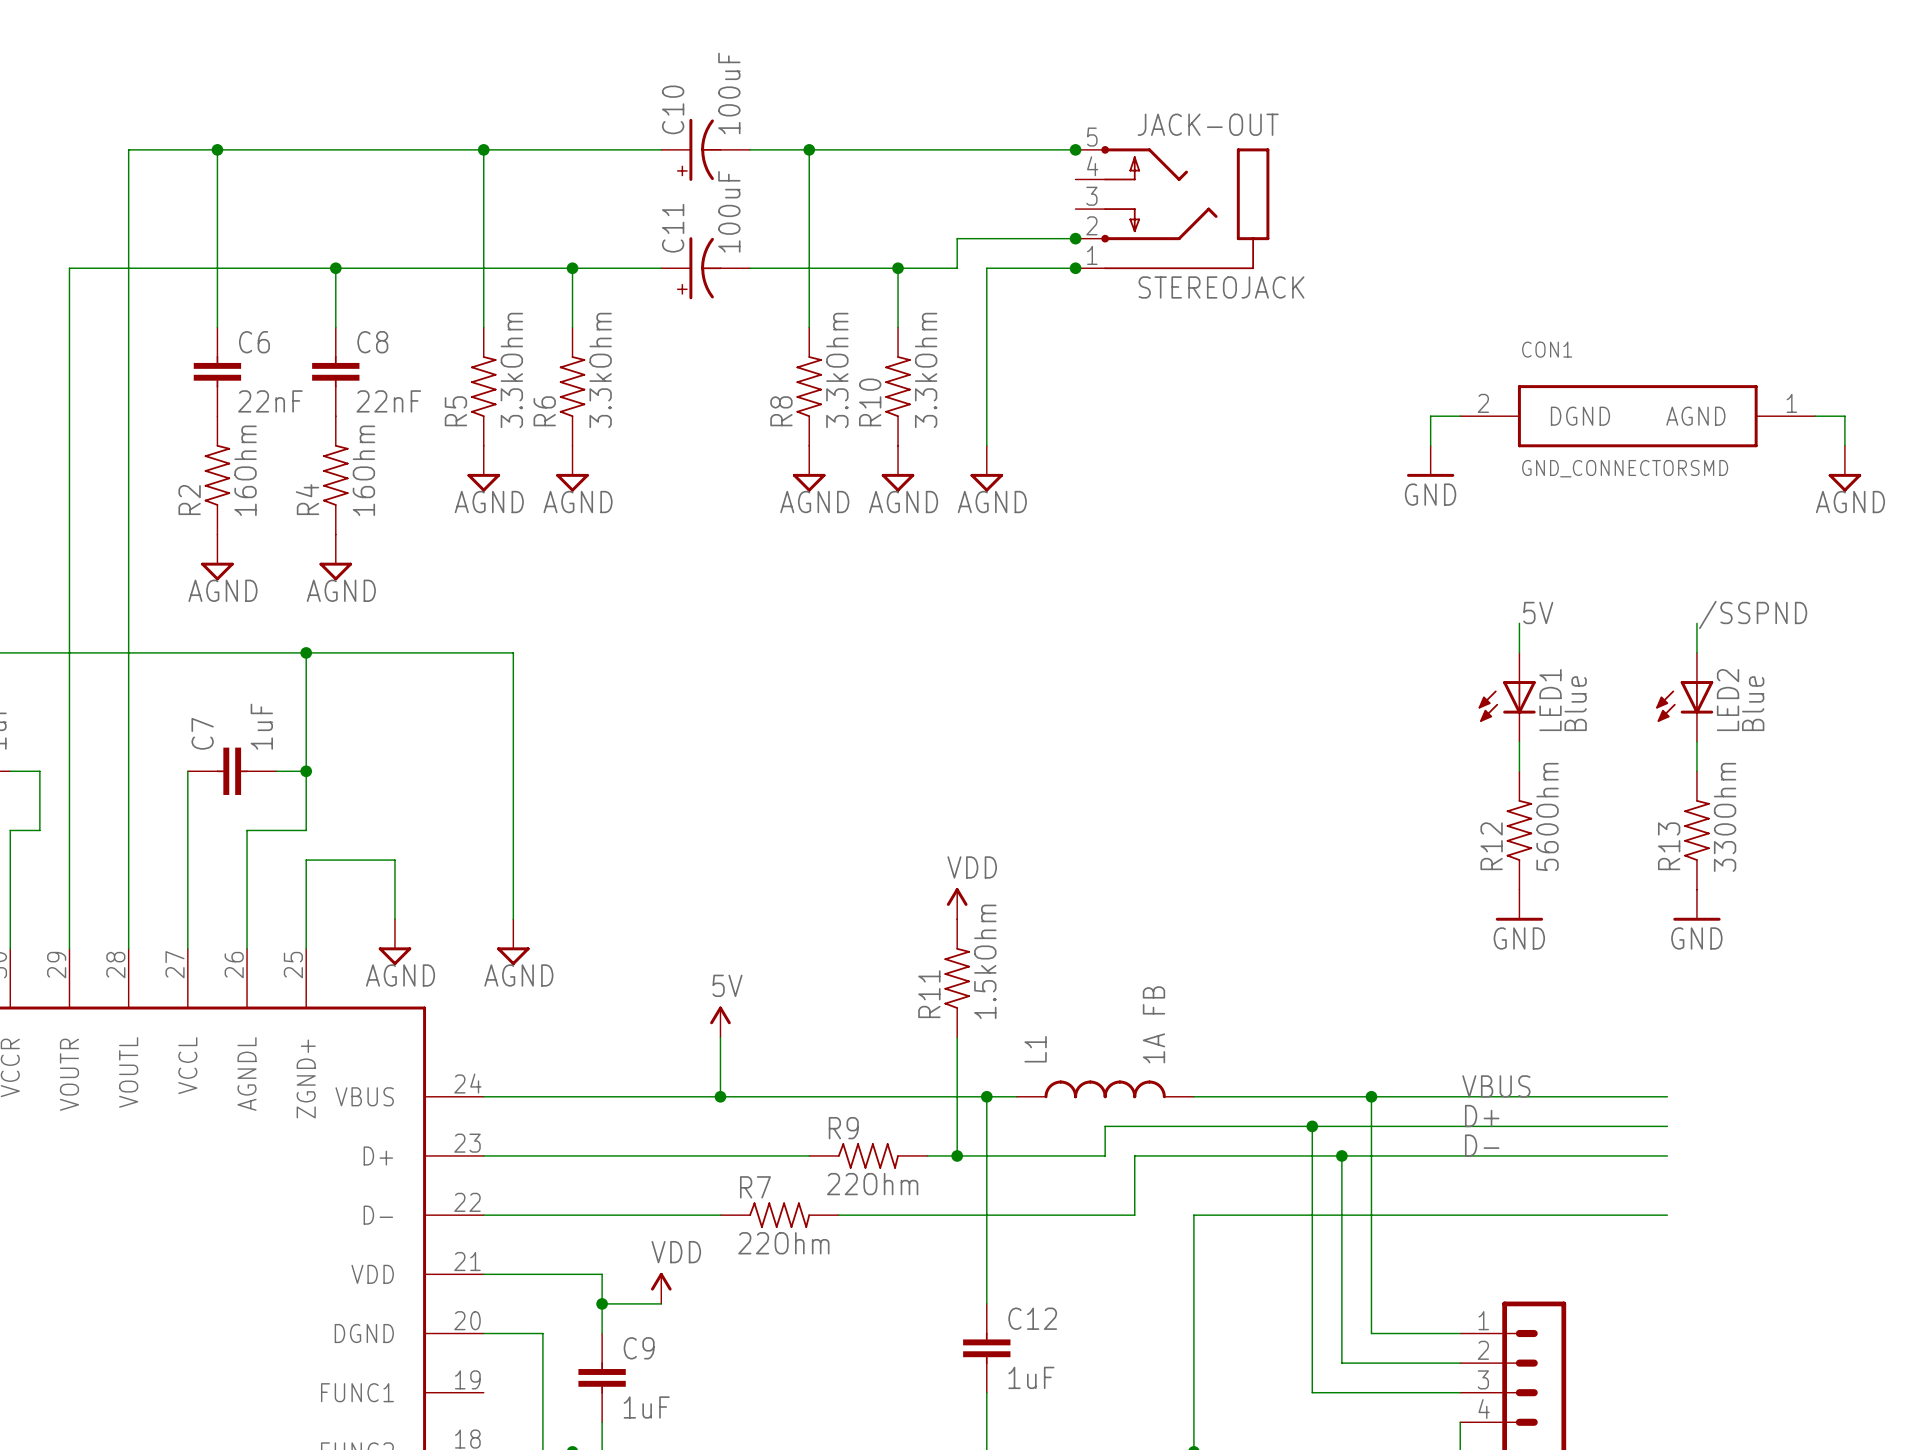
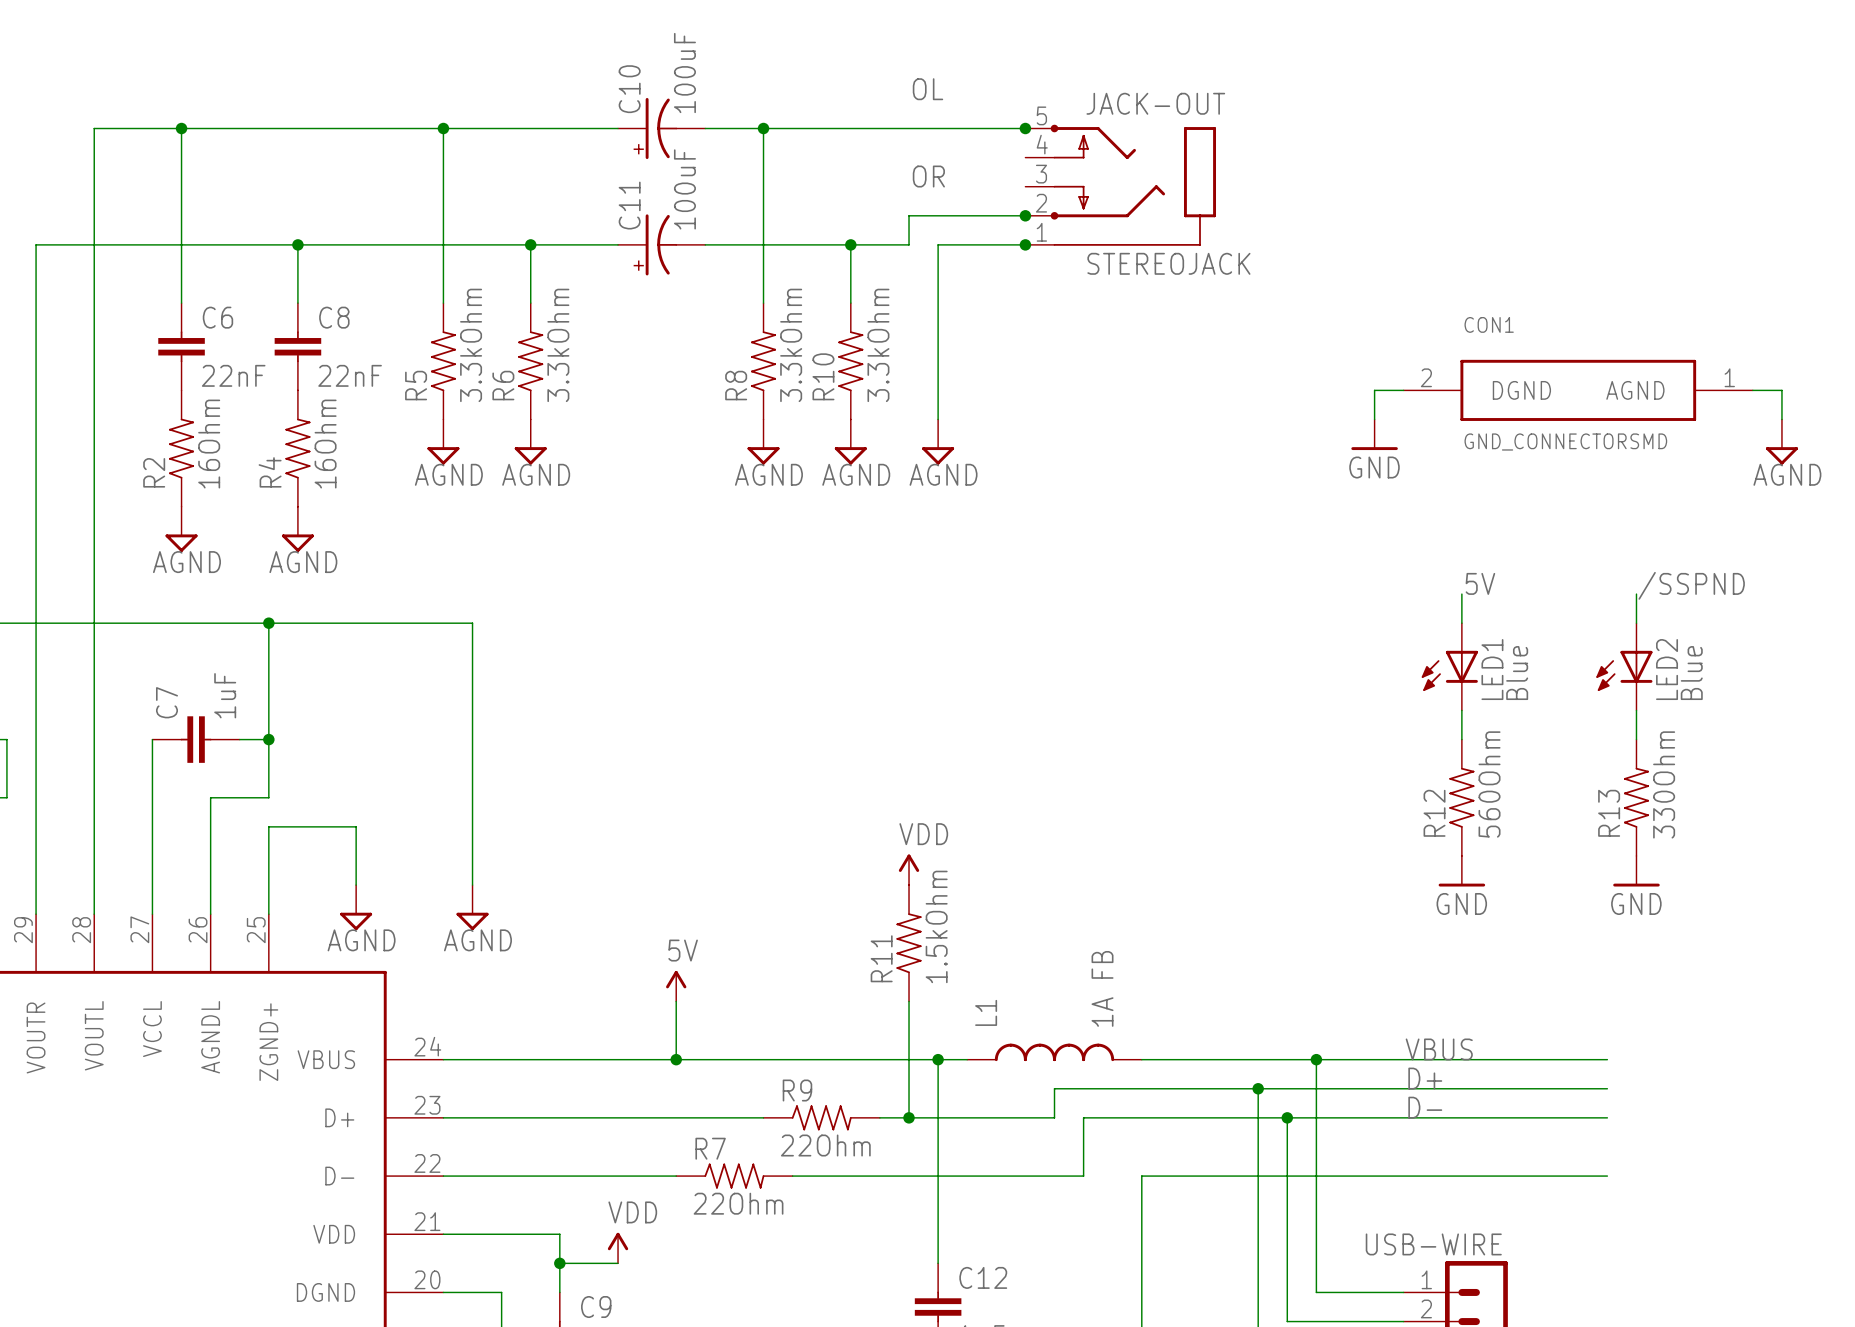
label: none -> OL (927, 89)
label: none -> OR (928, 176)
part value: none -> USB-WIRE (1433, 1244)

